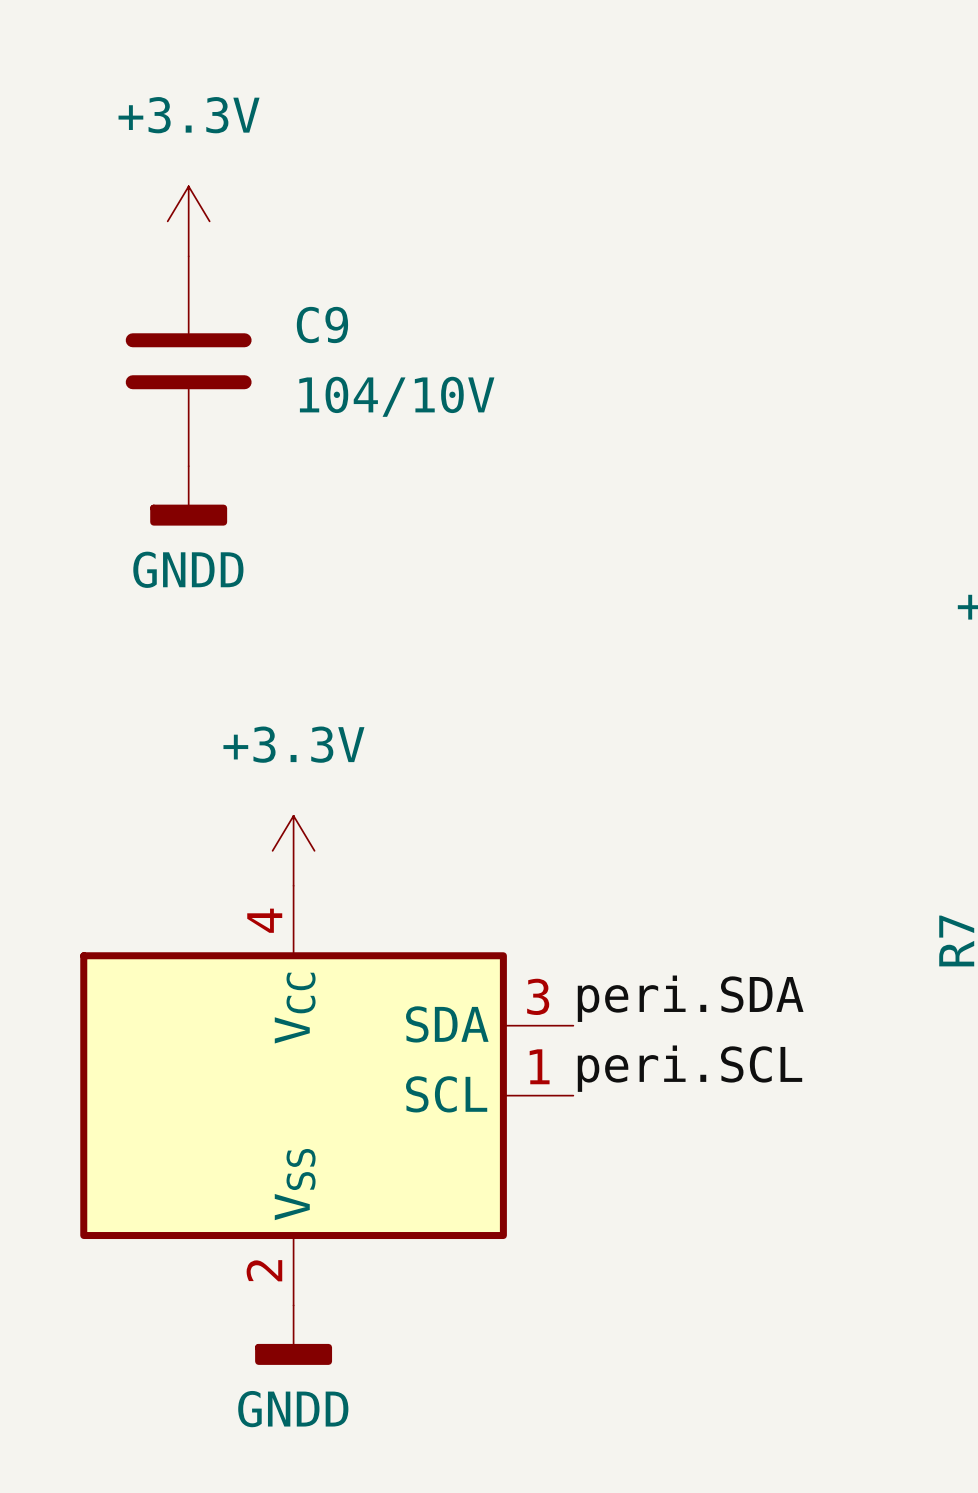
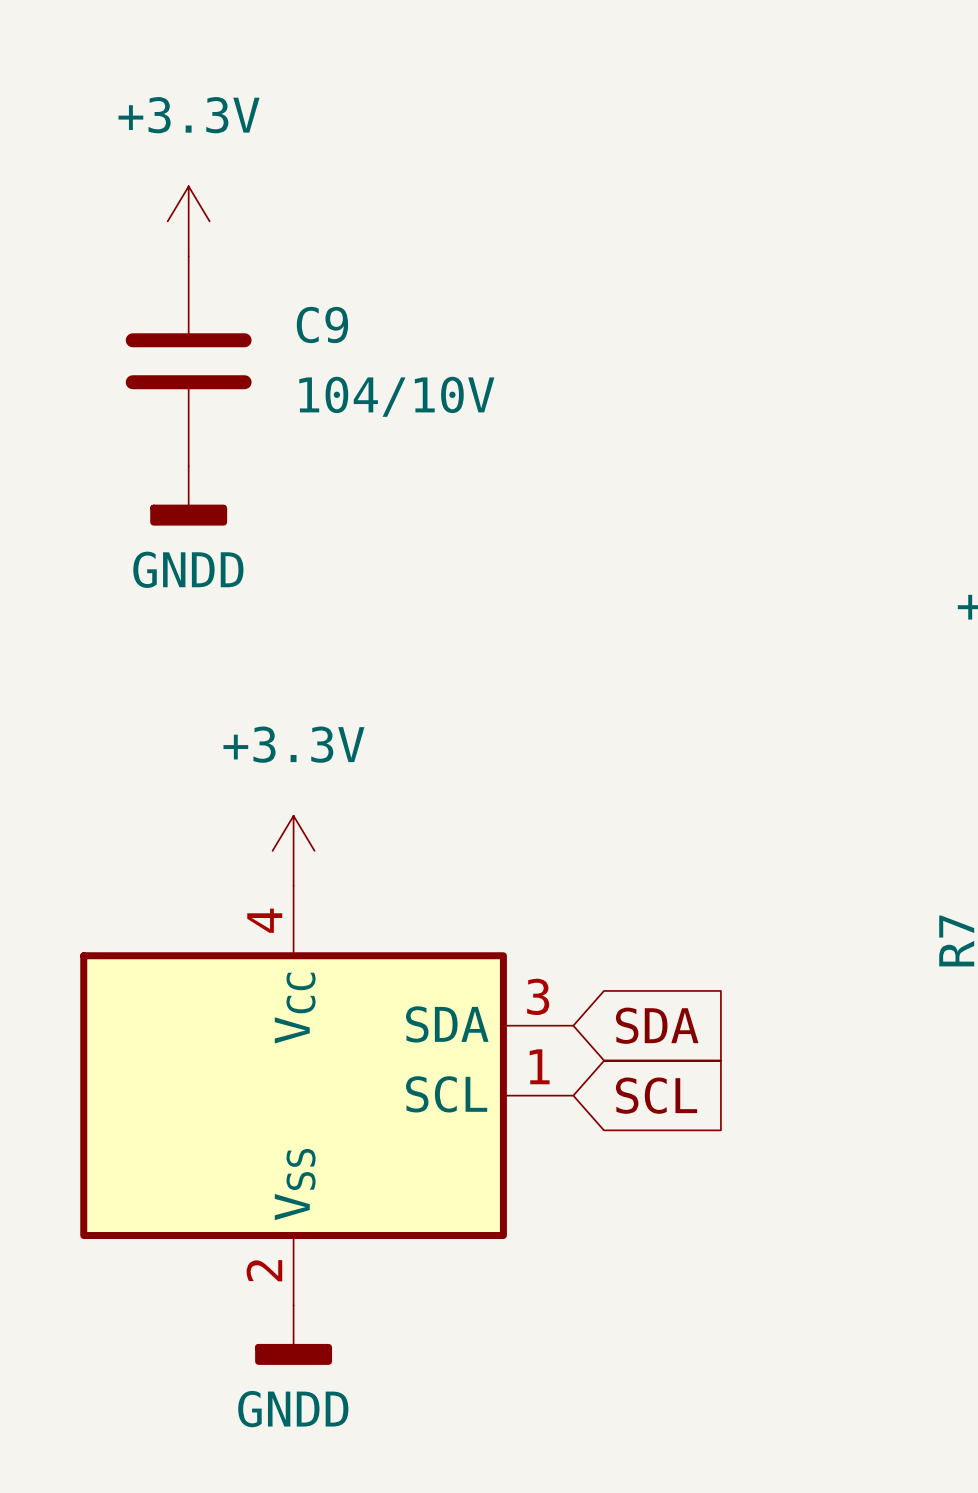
label: peri.SDA (690, 998) -> none
global label: none -> SDA (657, 1025)
label: peri.SCL (689, 1068) -> none
global label: none -> SCL (656, 1095)

